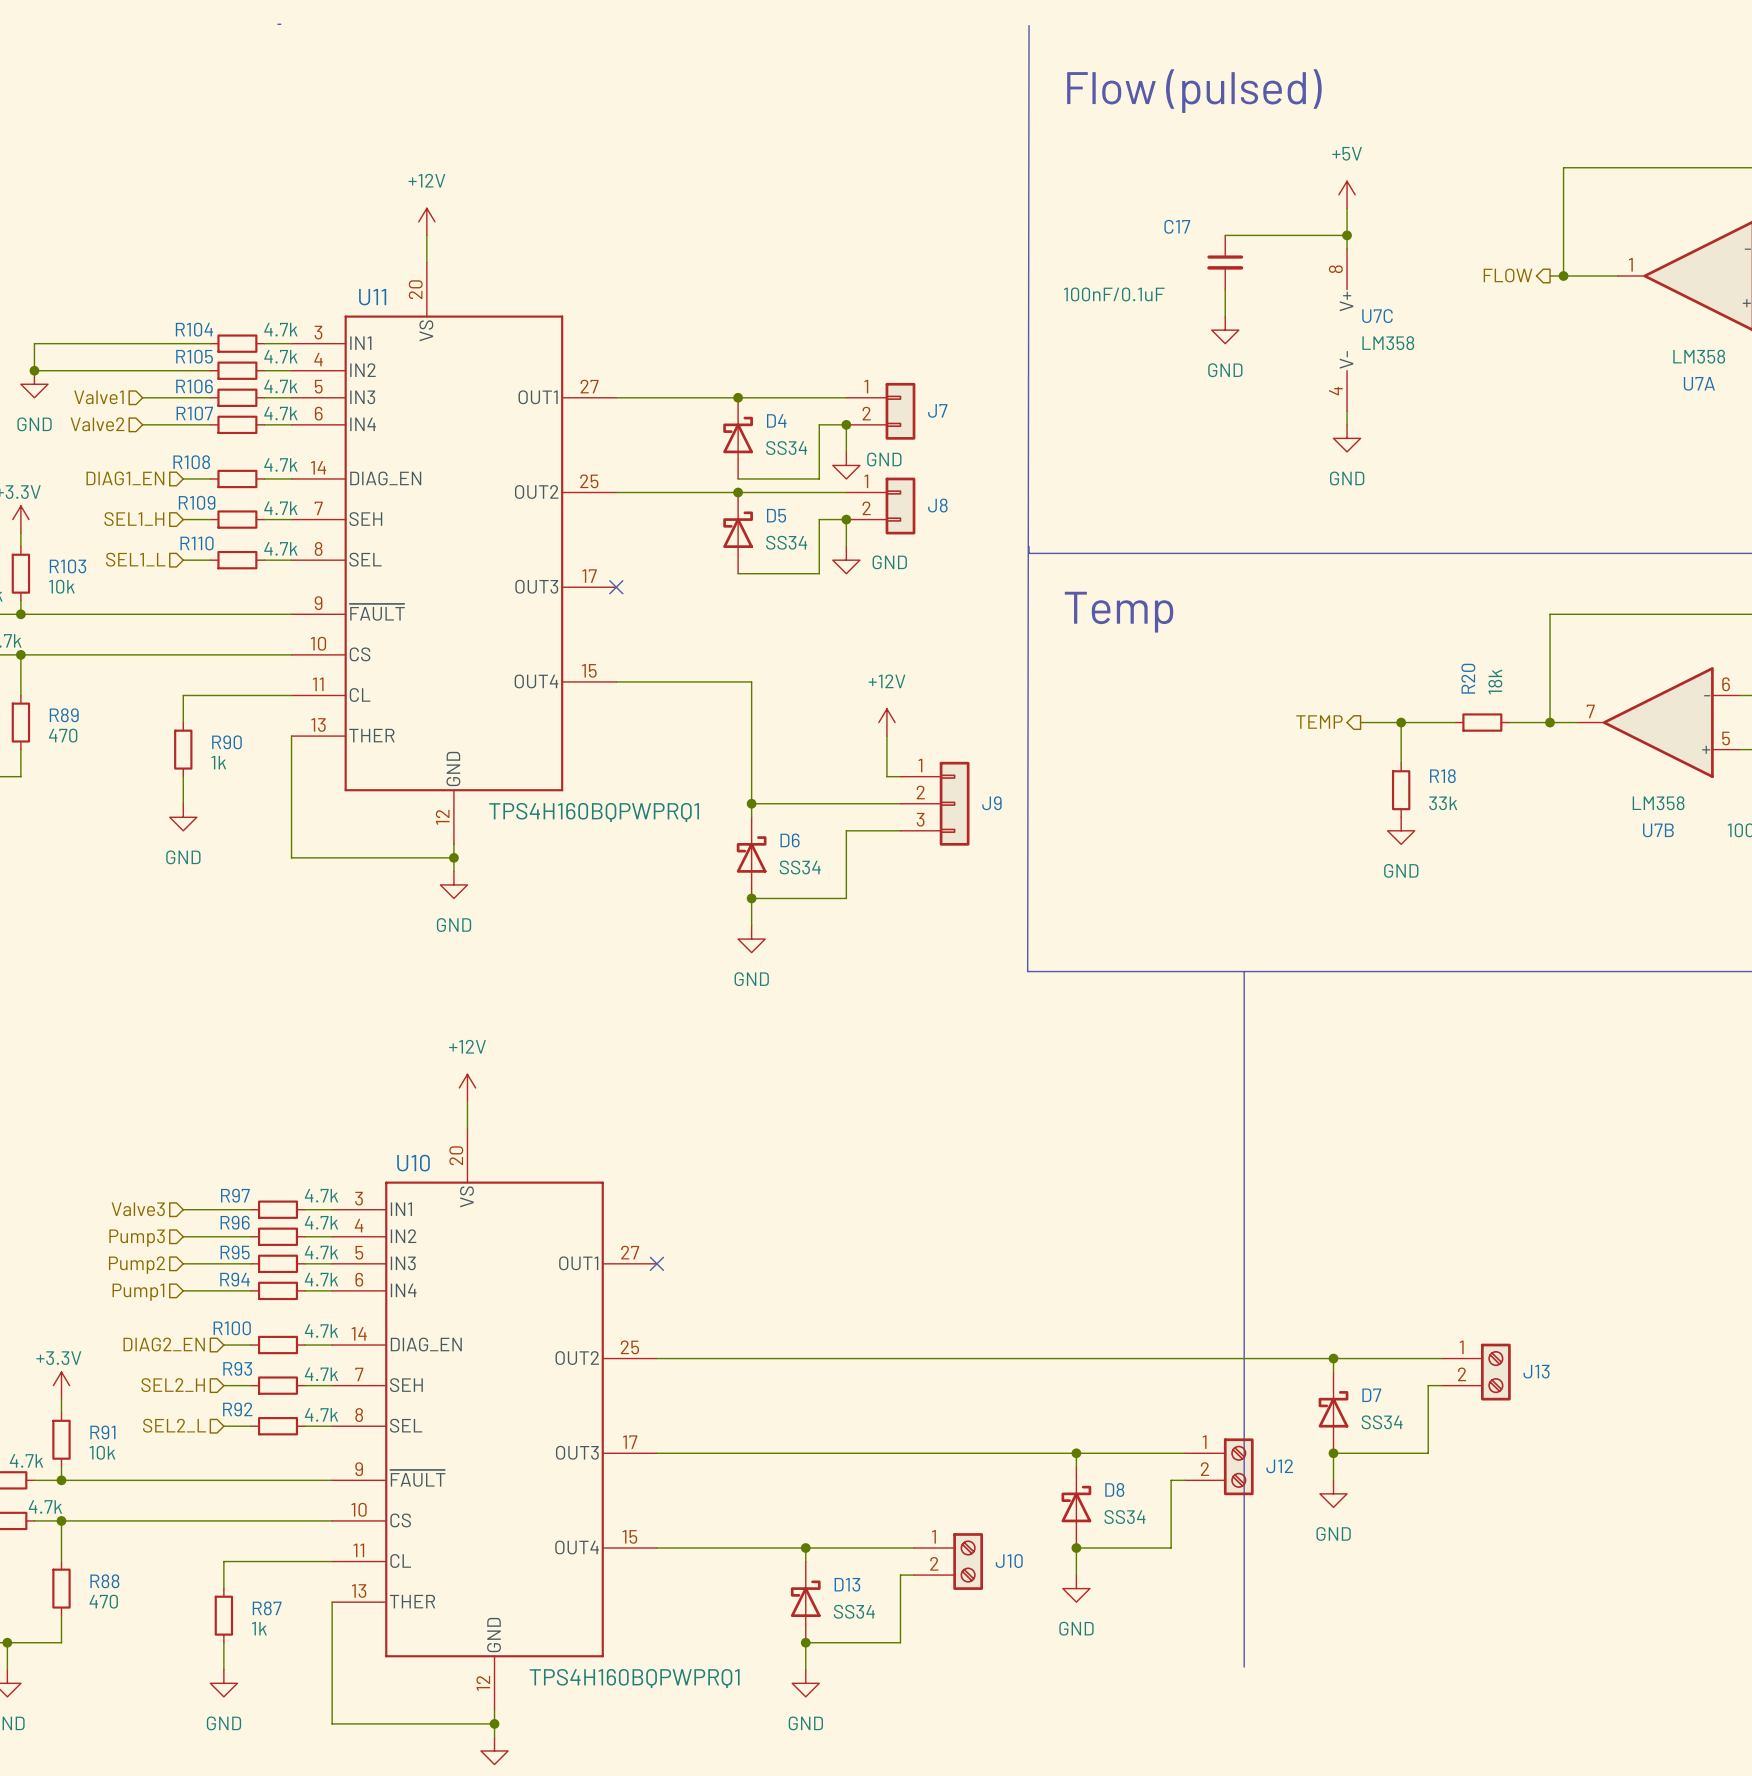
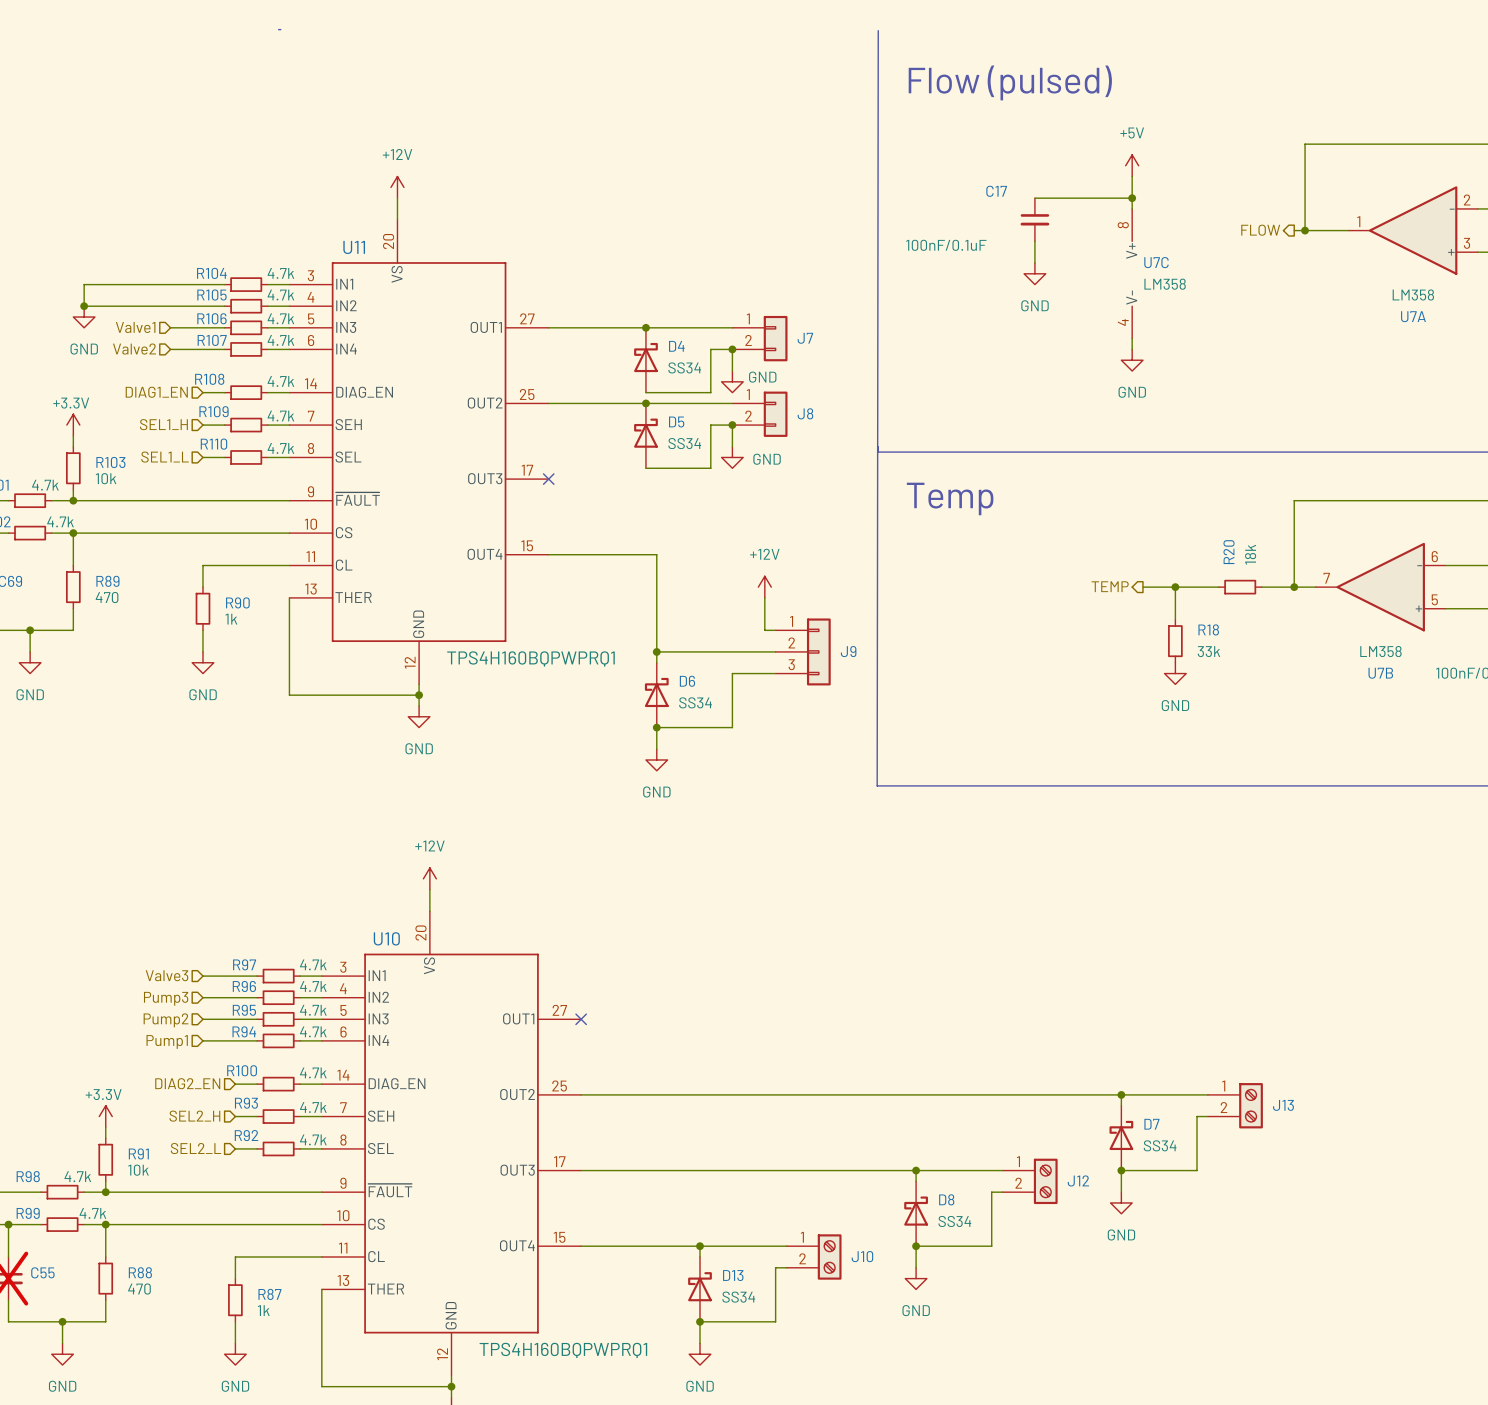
line: (1244, 971) (1244, 1667) -> none

